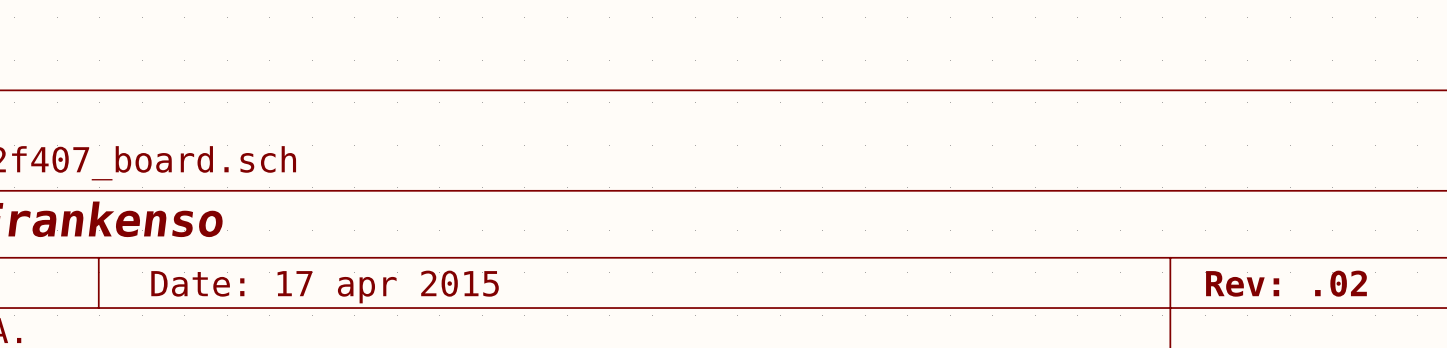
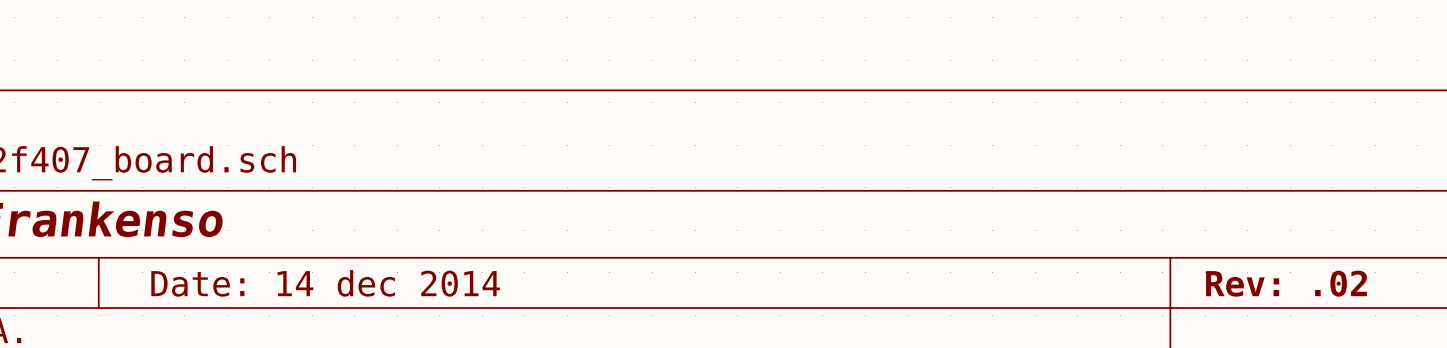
title block: Date: 17 apr 2015 (325, 286) -> Date: 14 dec 2014 (325, 283)

